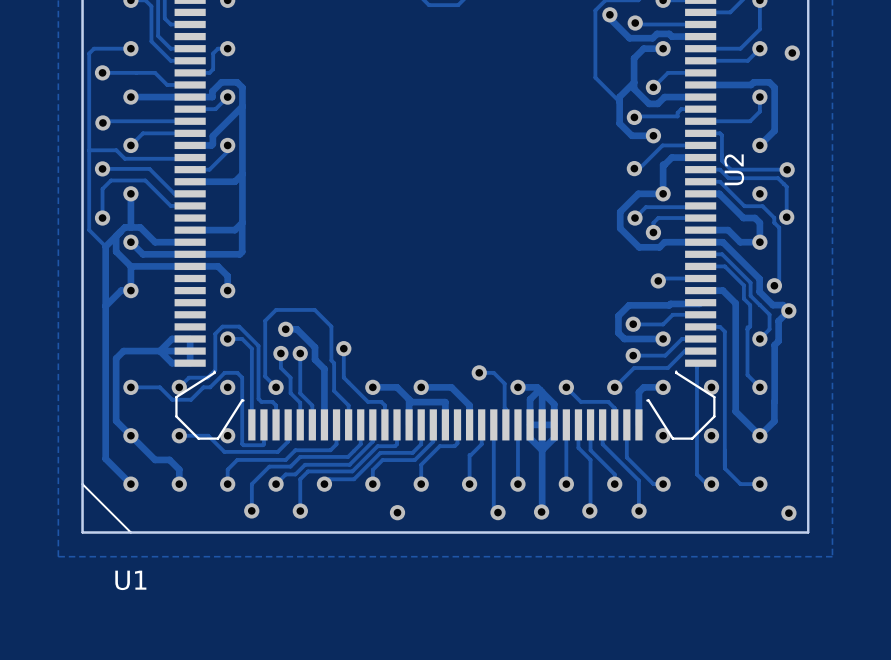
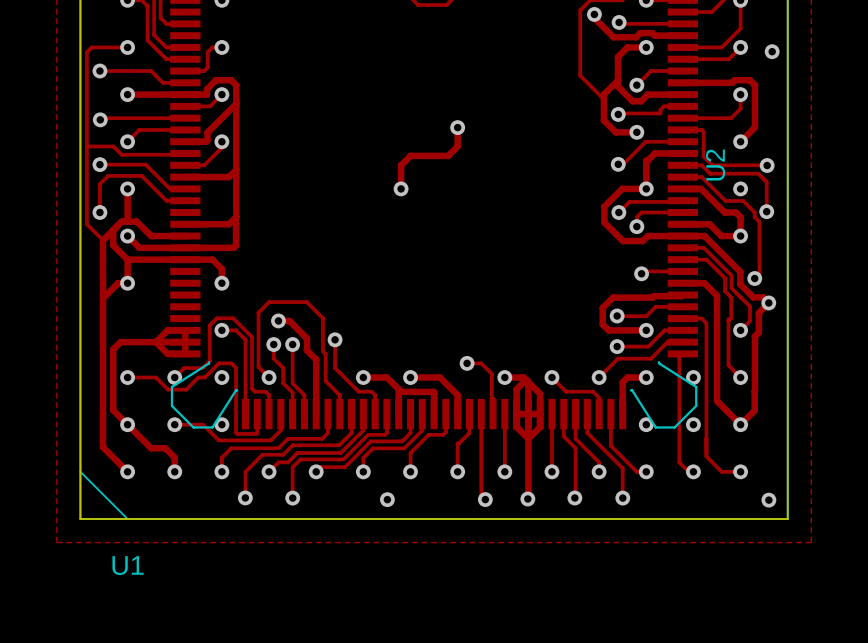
track: none -> (457, 127) (457, 146) (448, 155) (410, 155) (401, 165) (401, 188)
via: none -> (457, 127)
via: none -> (401, 188)

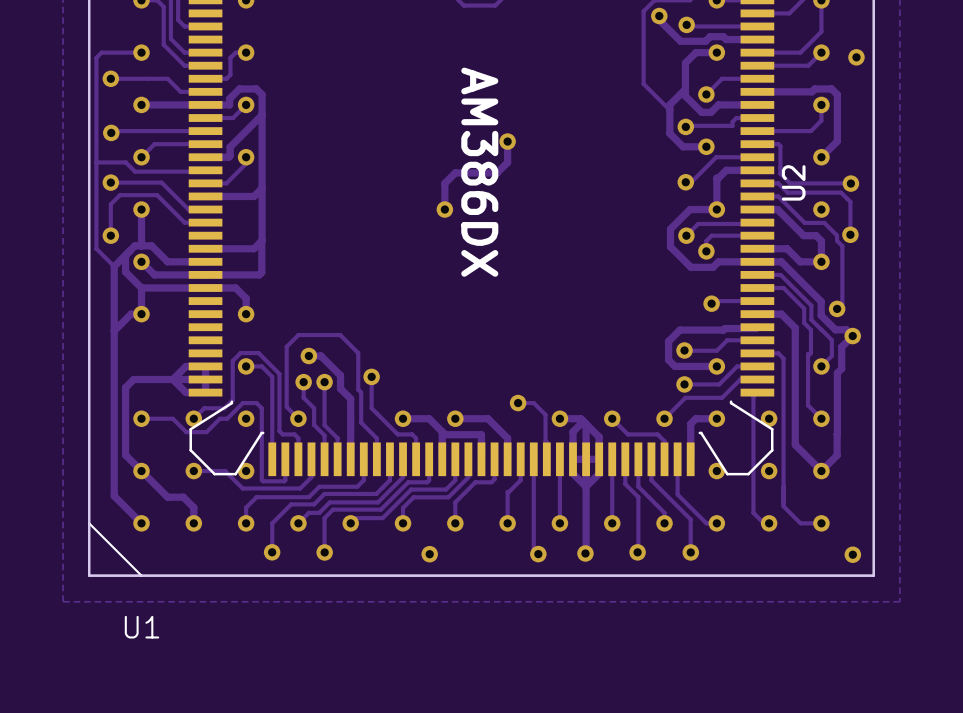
text: none -> AM386DX (479, 172)

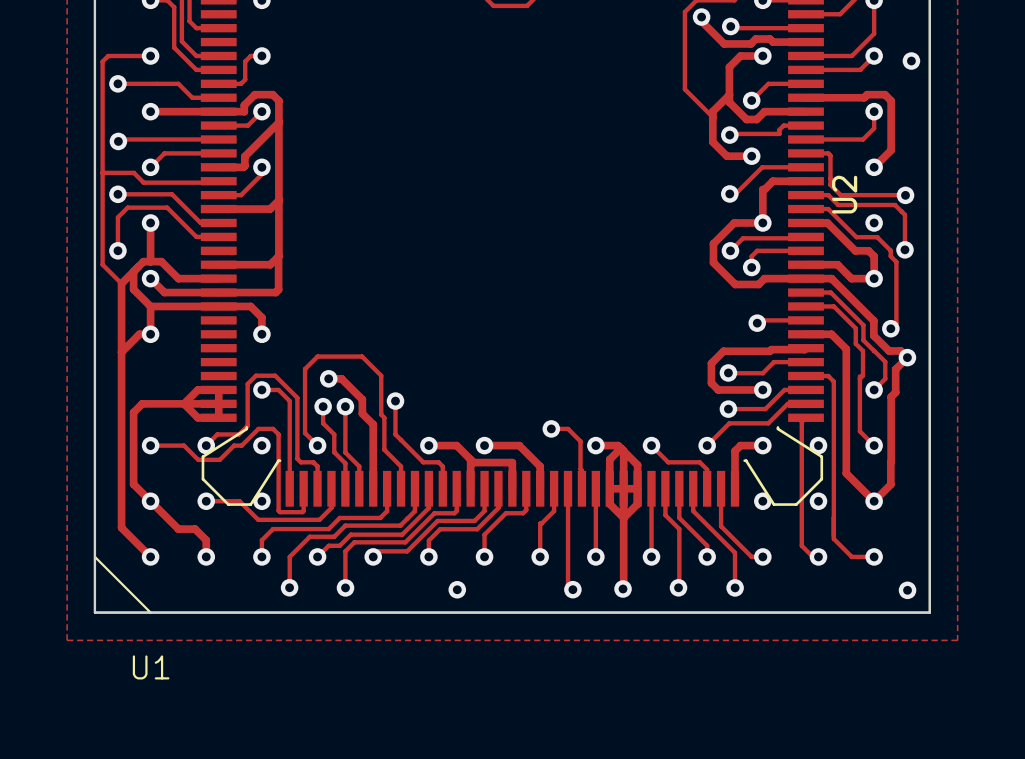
track: (507, 141) (507, 162) (497, 172) (455, 172) (444, 183) (444, 209) -> none
via: (507, 141) -> none
text: AM386DX (479, 172) -> none
via: (444, 209) -> none

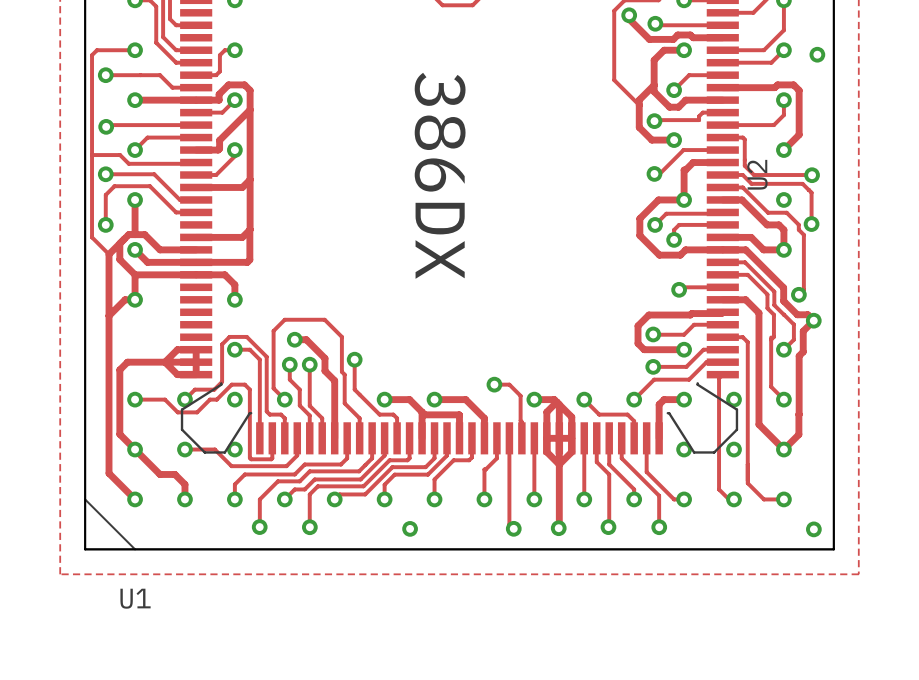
text: none -> 386DX (440, 175)

